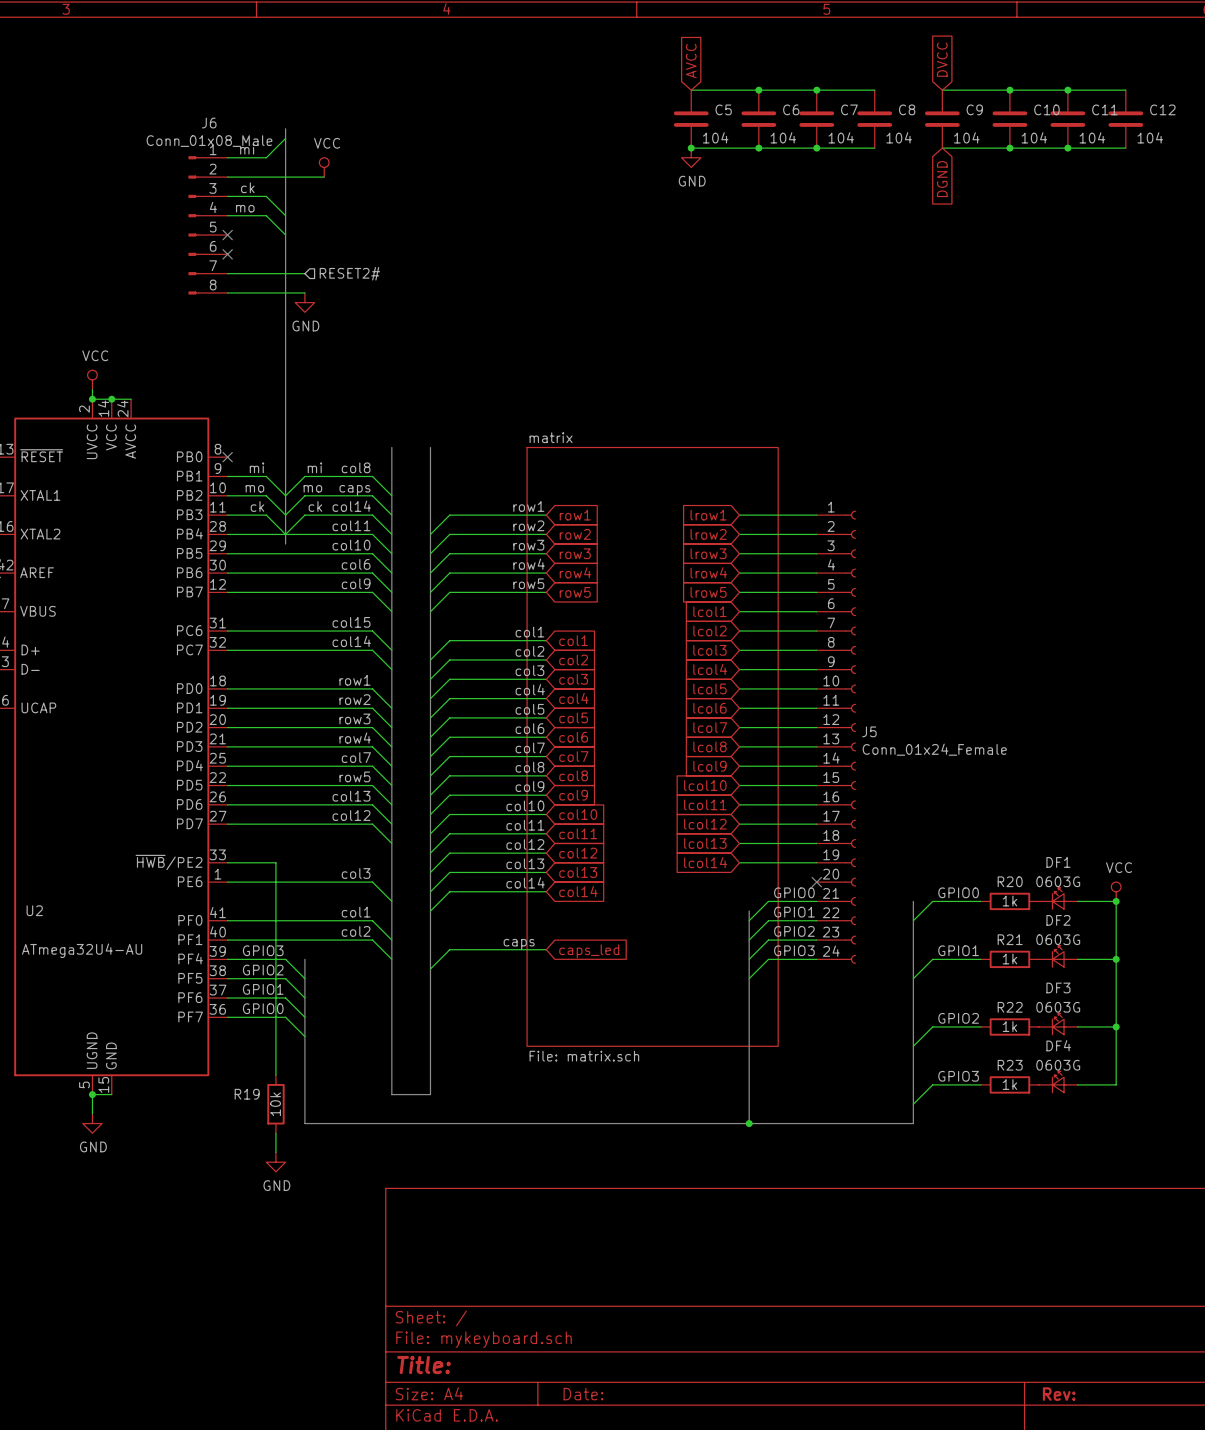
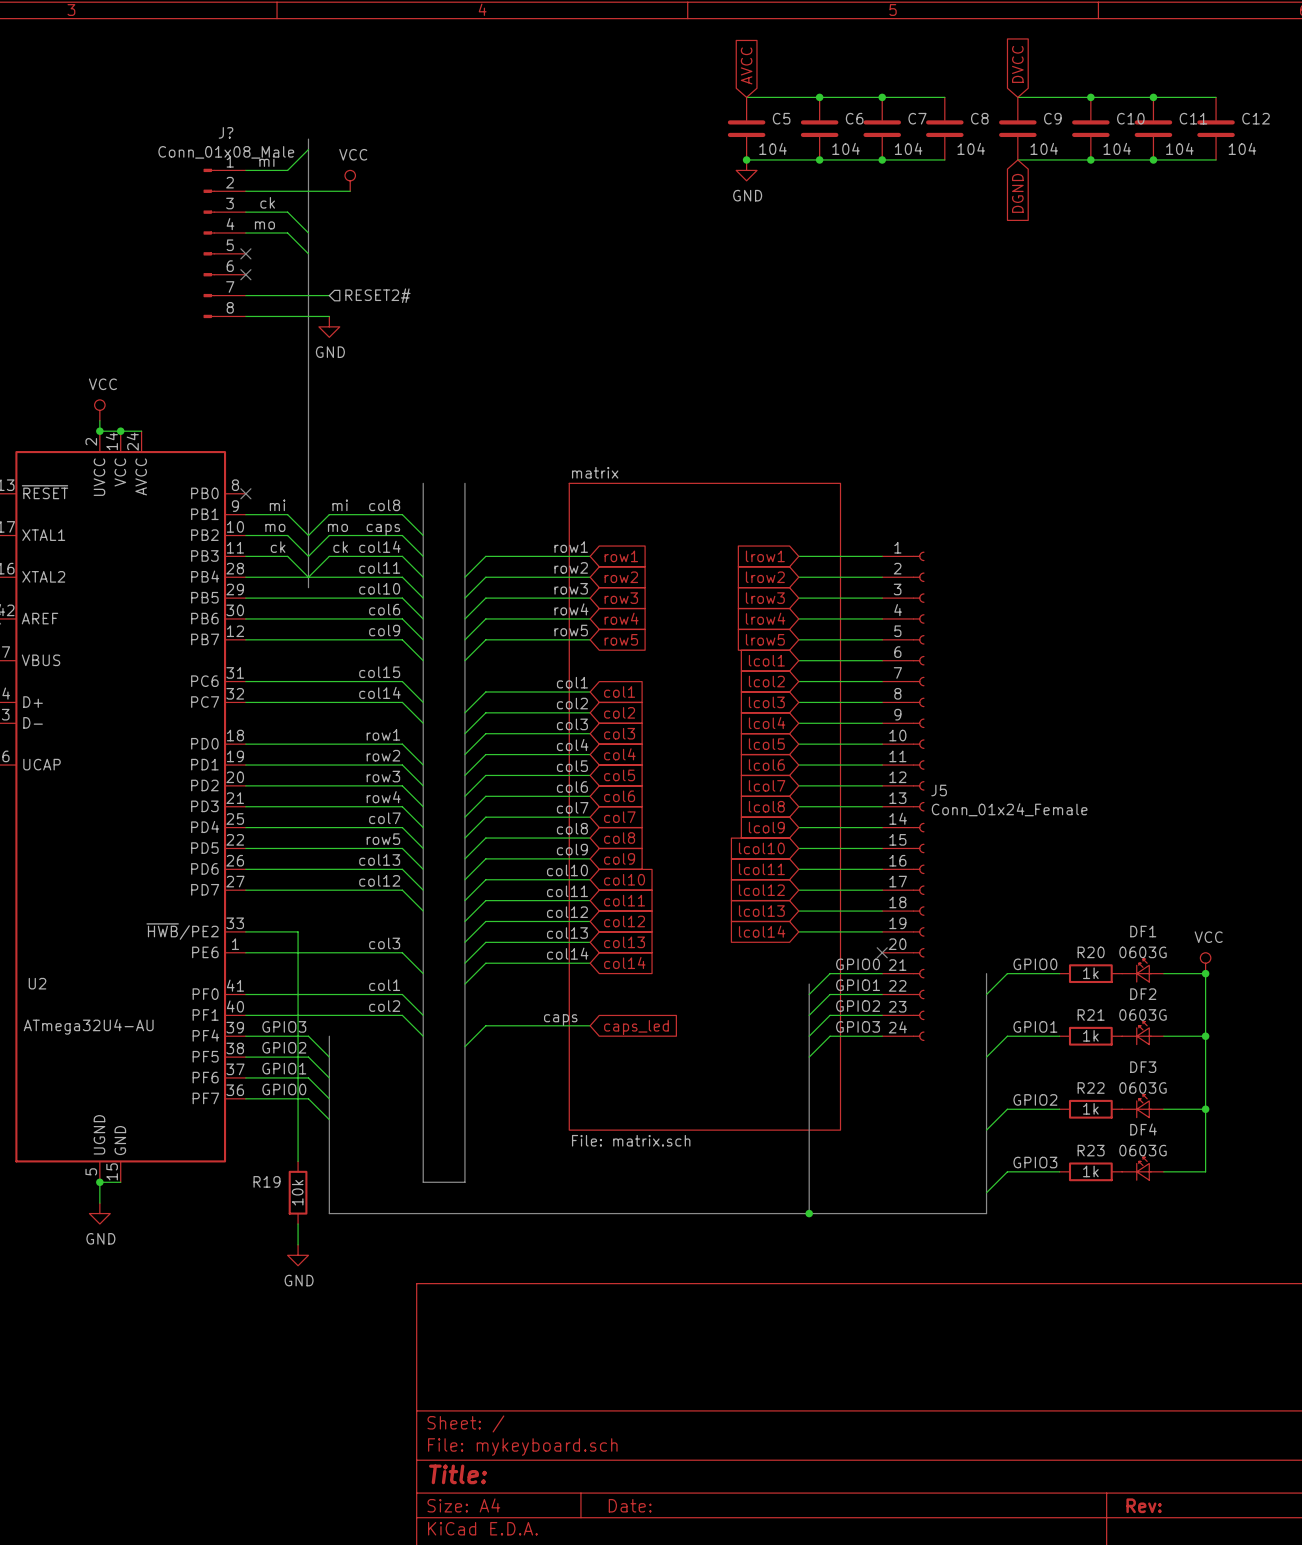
J6 name: J6 (209, 123) -> J? (226, 132)

